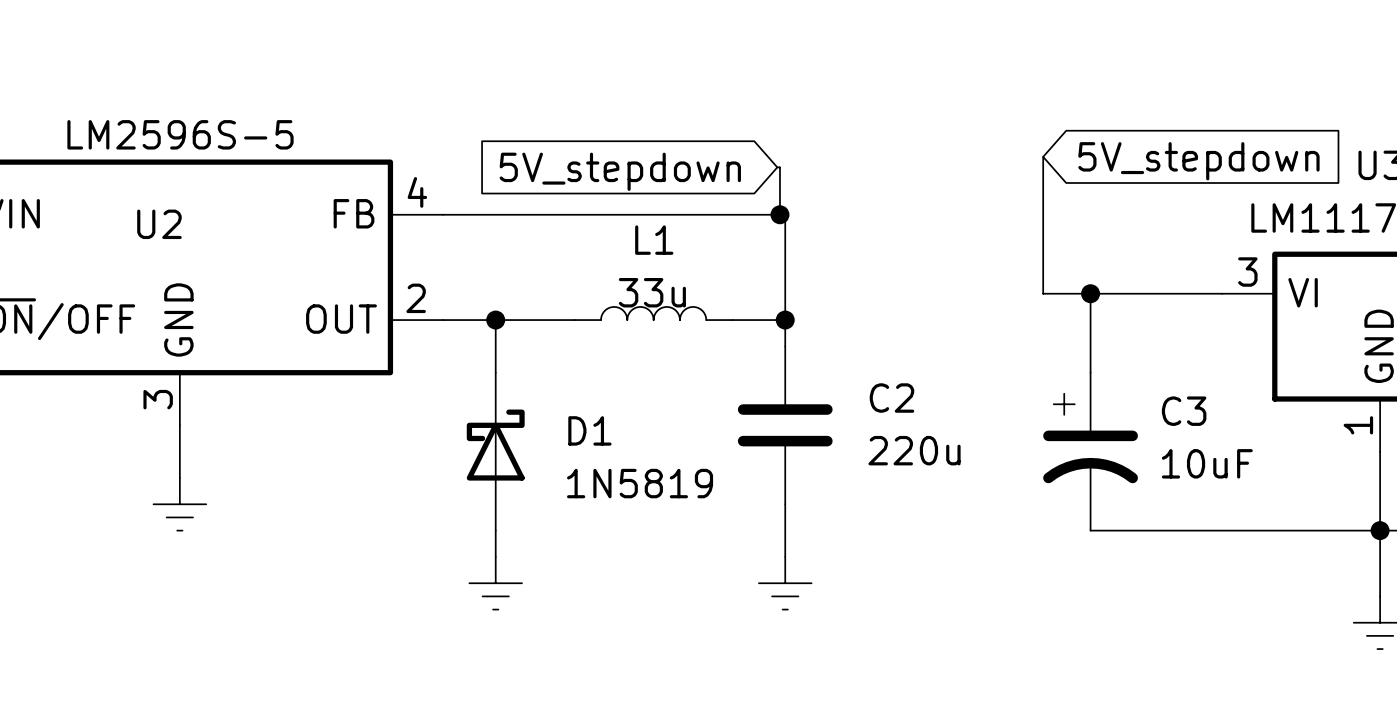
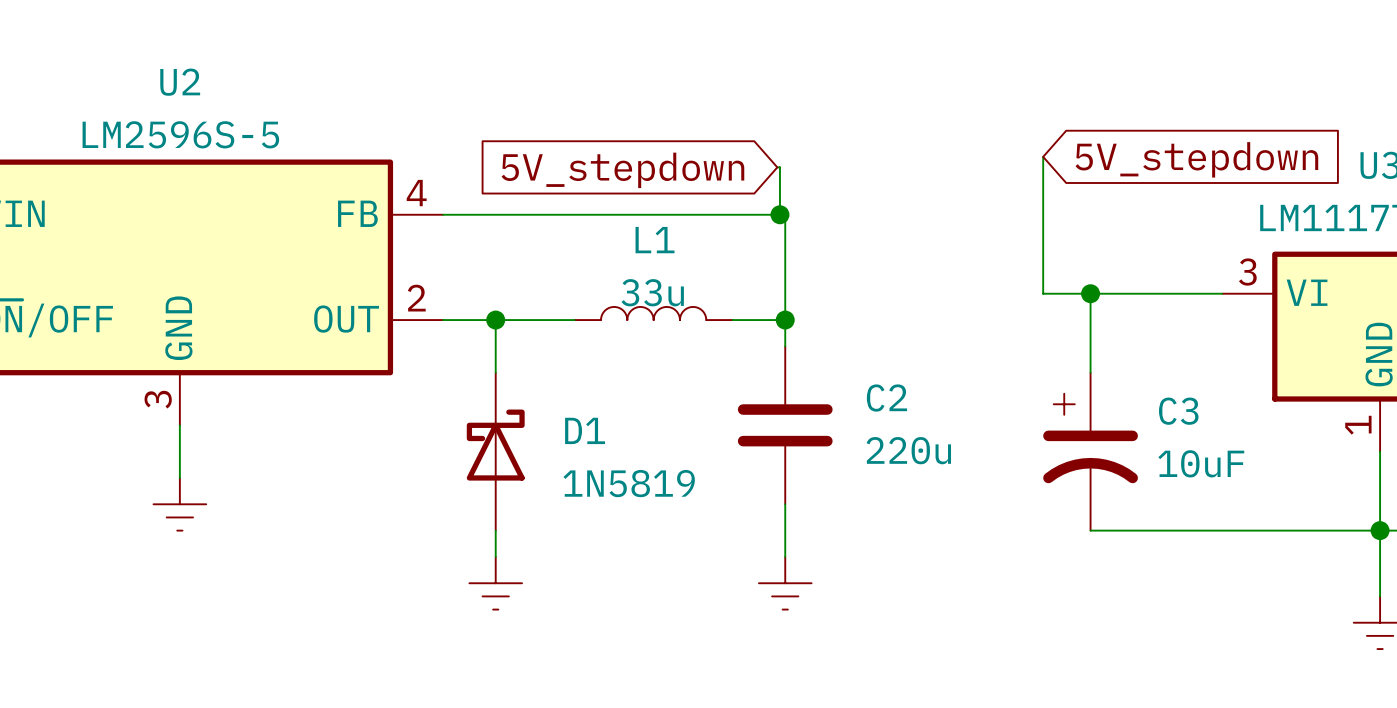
U2 name position: U2 (159, 224) -> U2 (180, 82)

